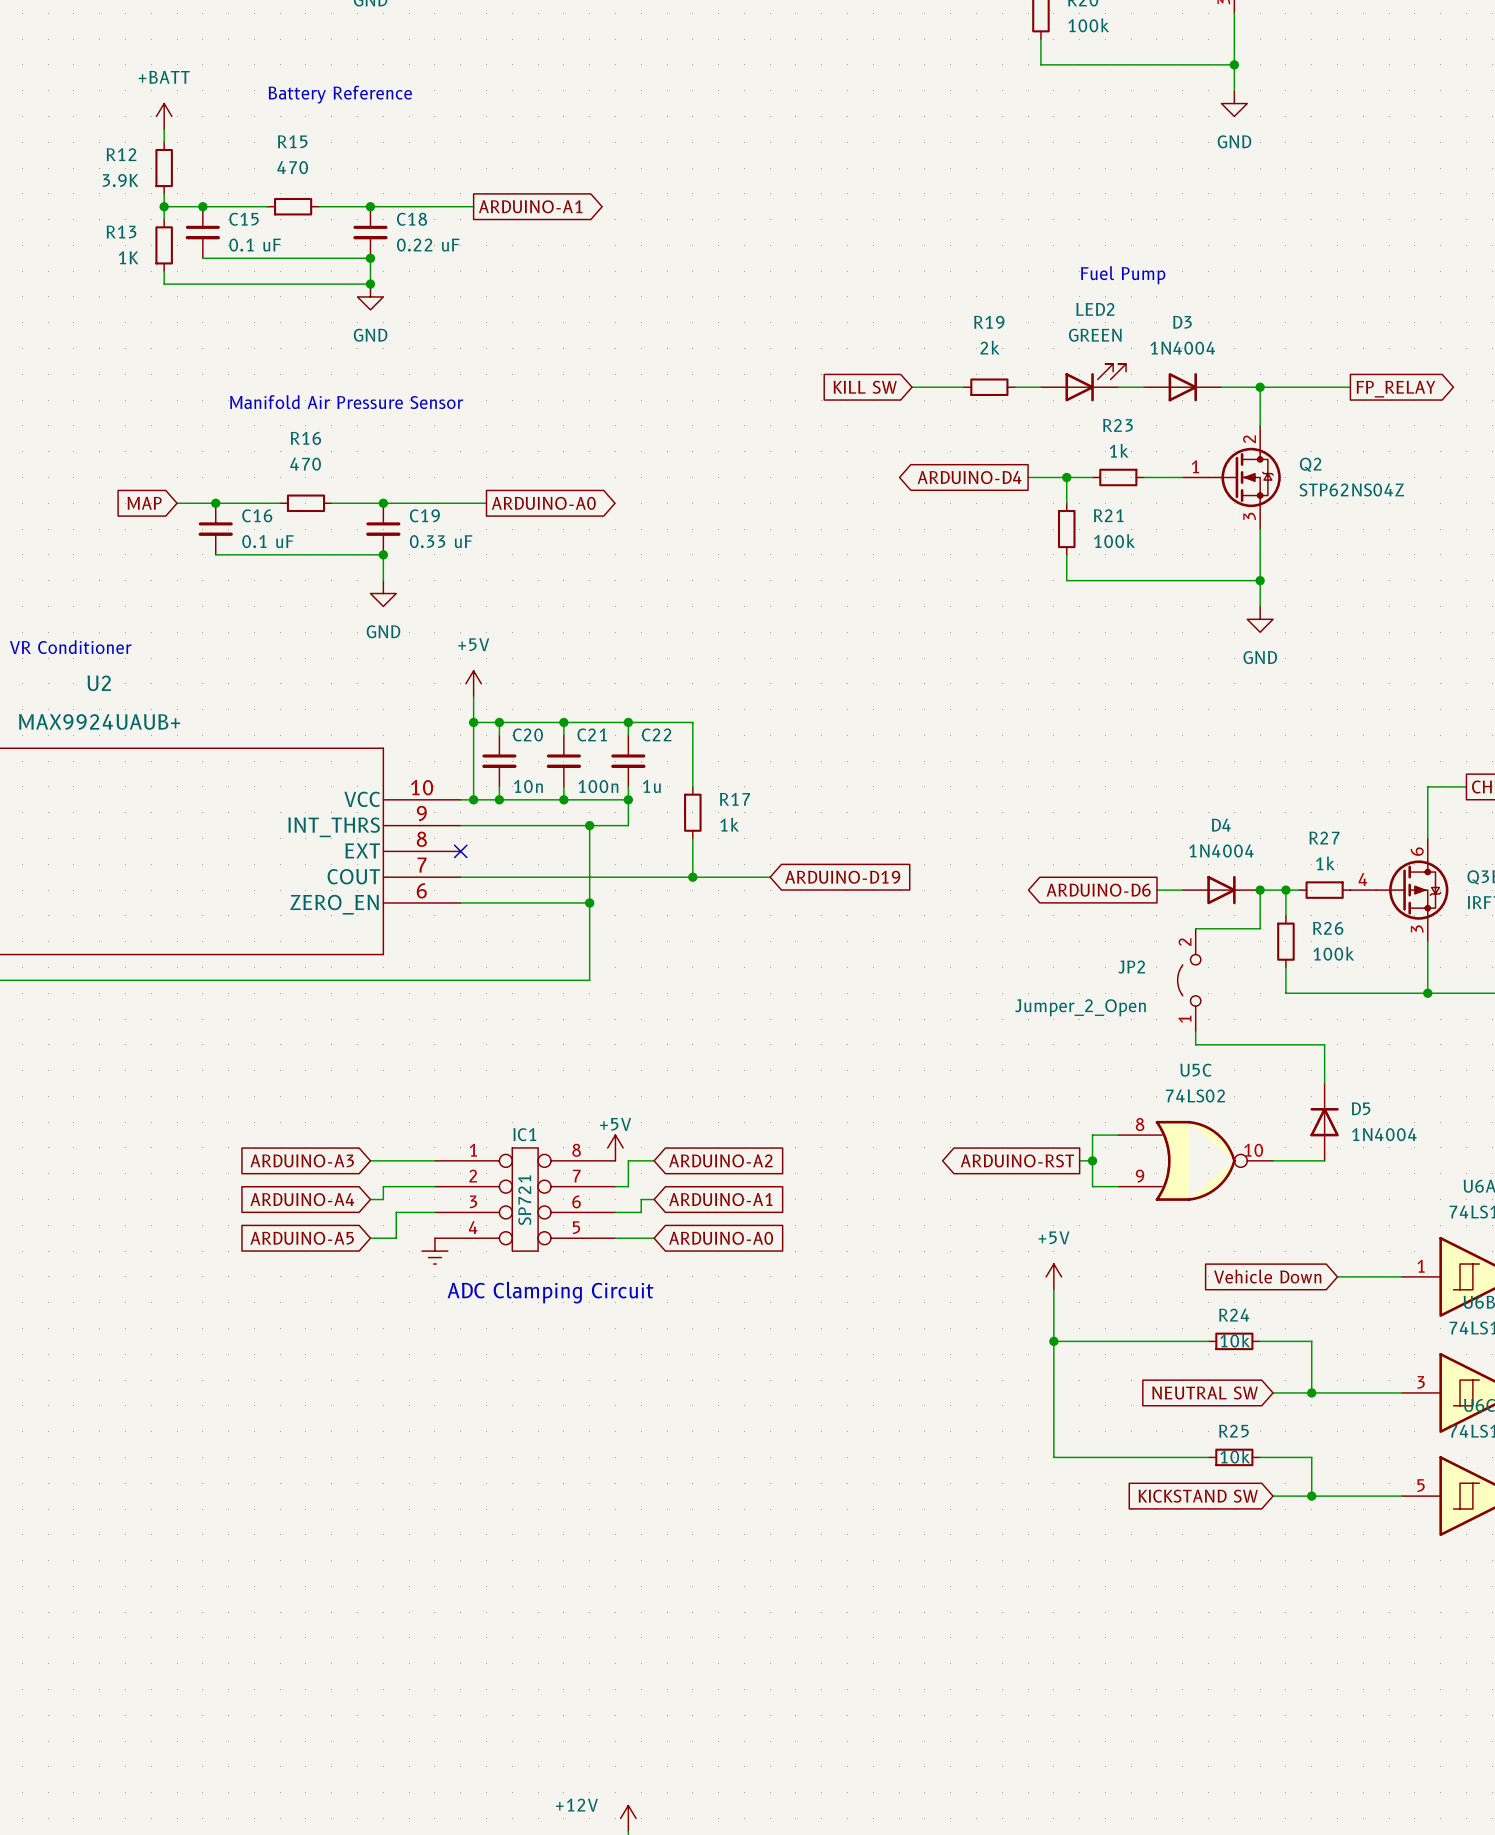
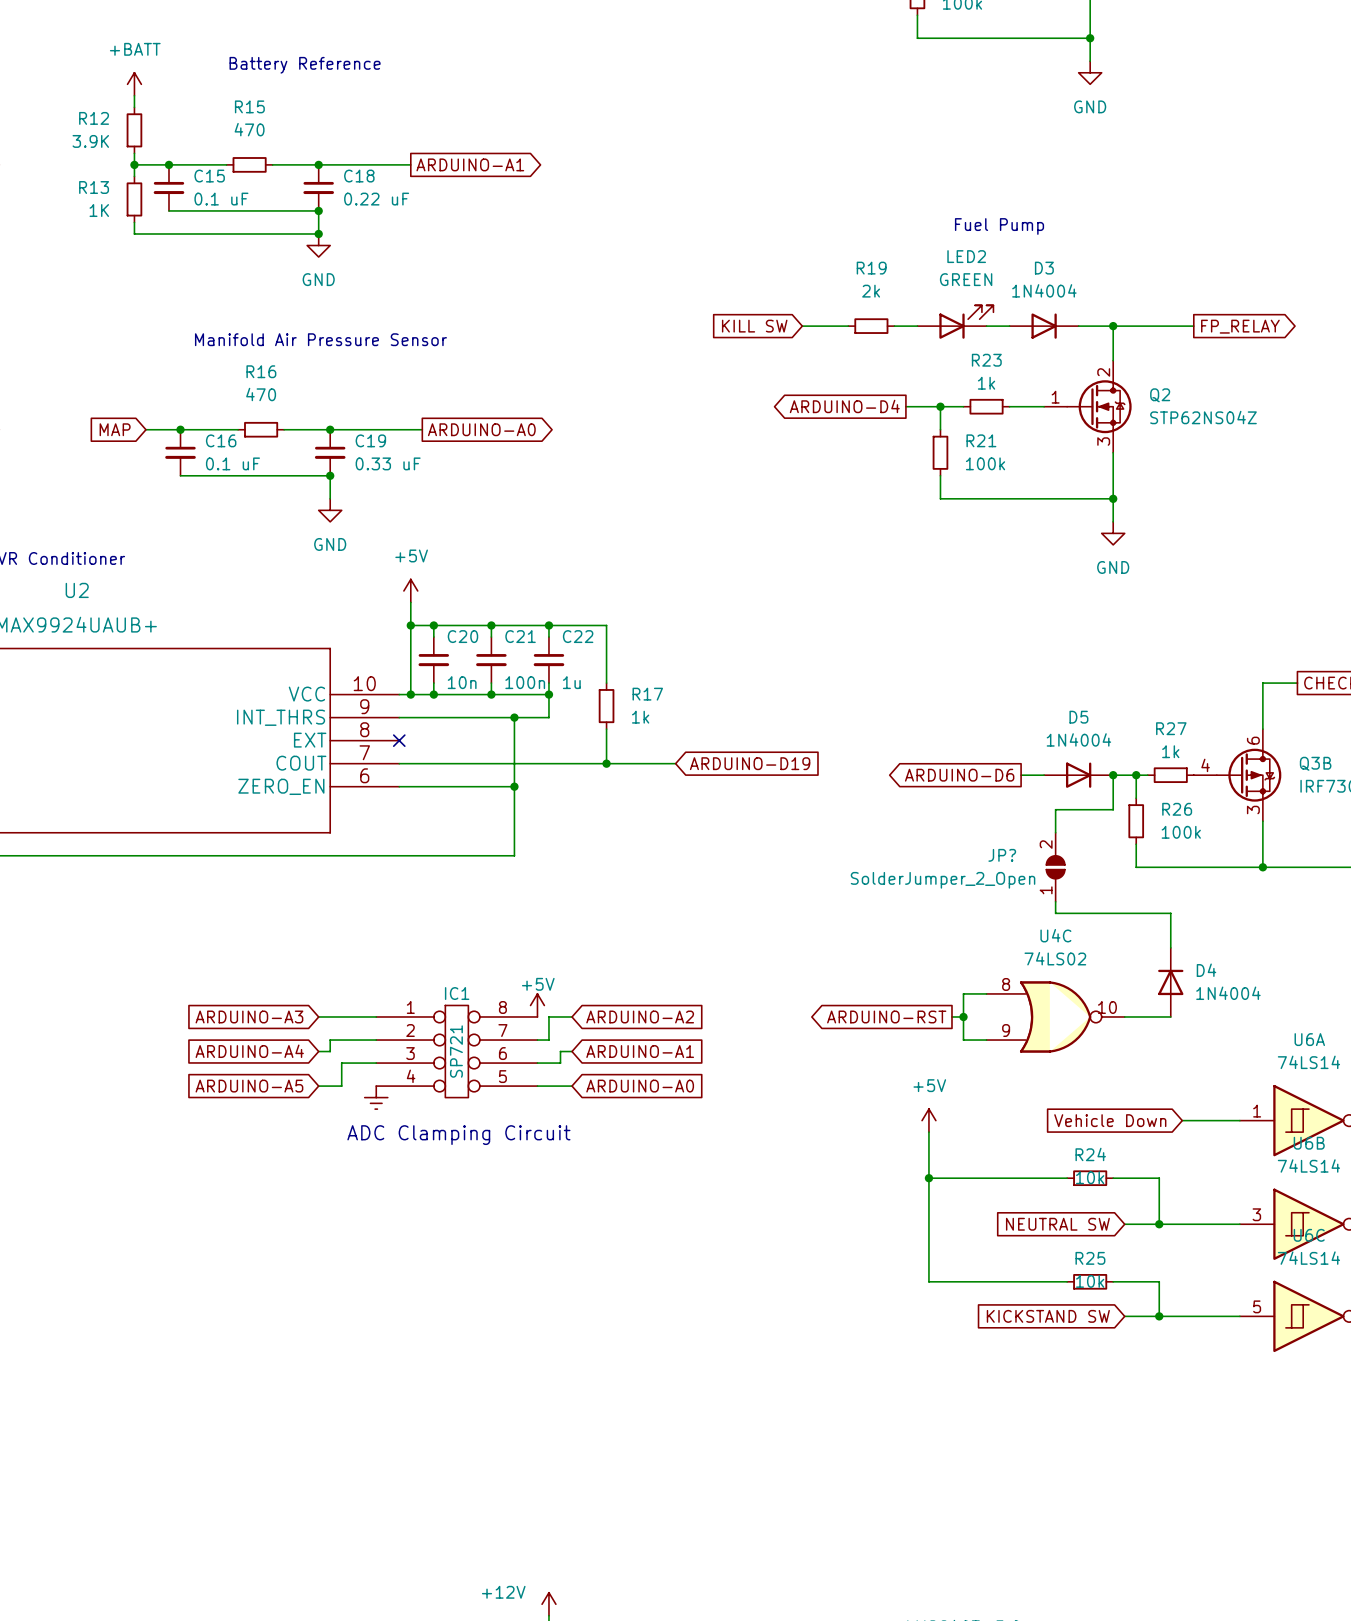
D4 name: D4 (1221, 825) -> D5 (1078, 717)
JP2: Jumper_2_Open (1189, 980) -> none
JP?: none -> SolderJumper_2_Open (1055, 867)
U5C name: U5C (1195, 1070) -> U4C (1055, 935)
D5 name: D5 (1361, 1108) -> D4 (1206, 970)

